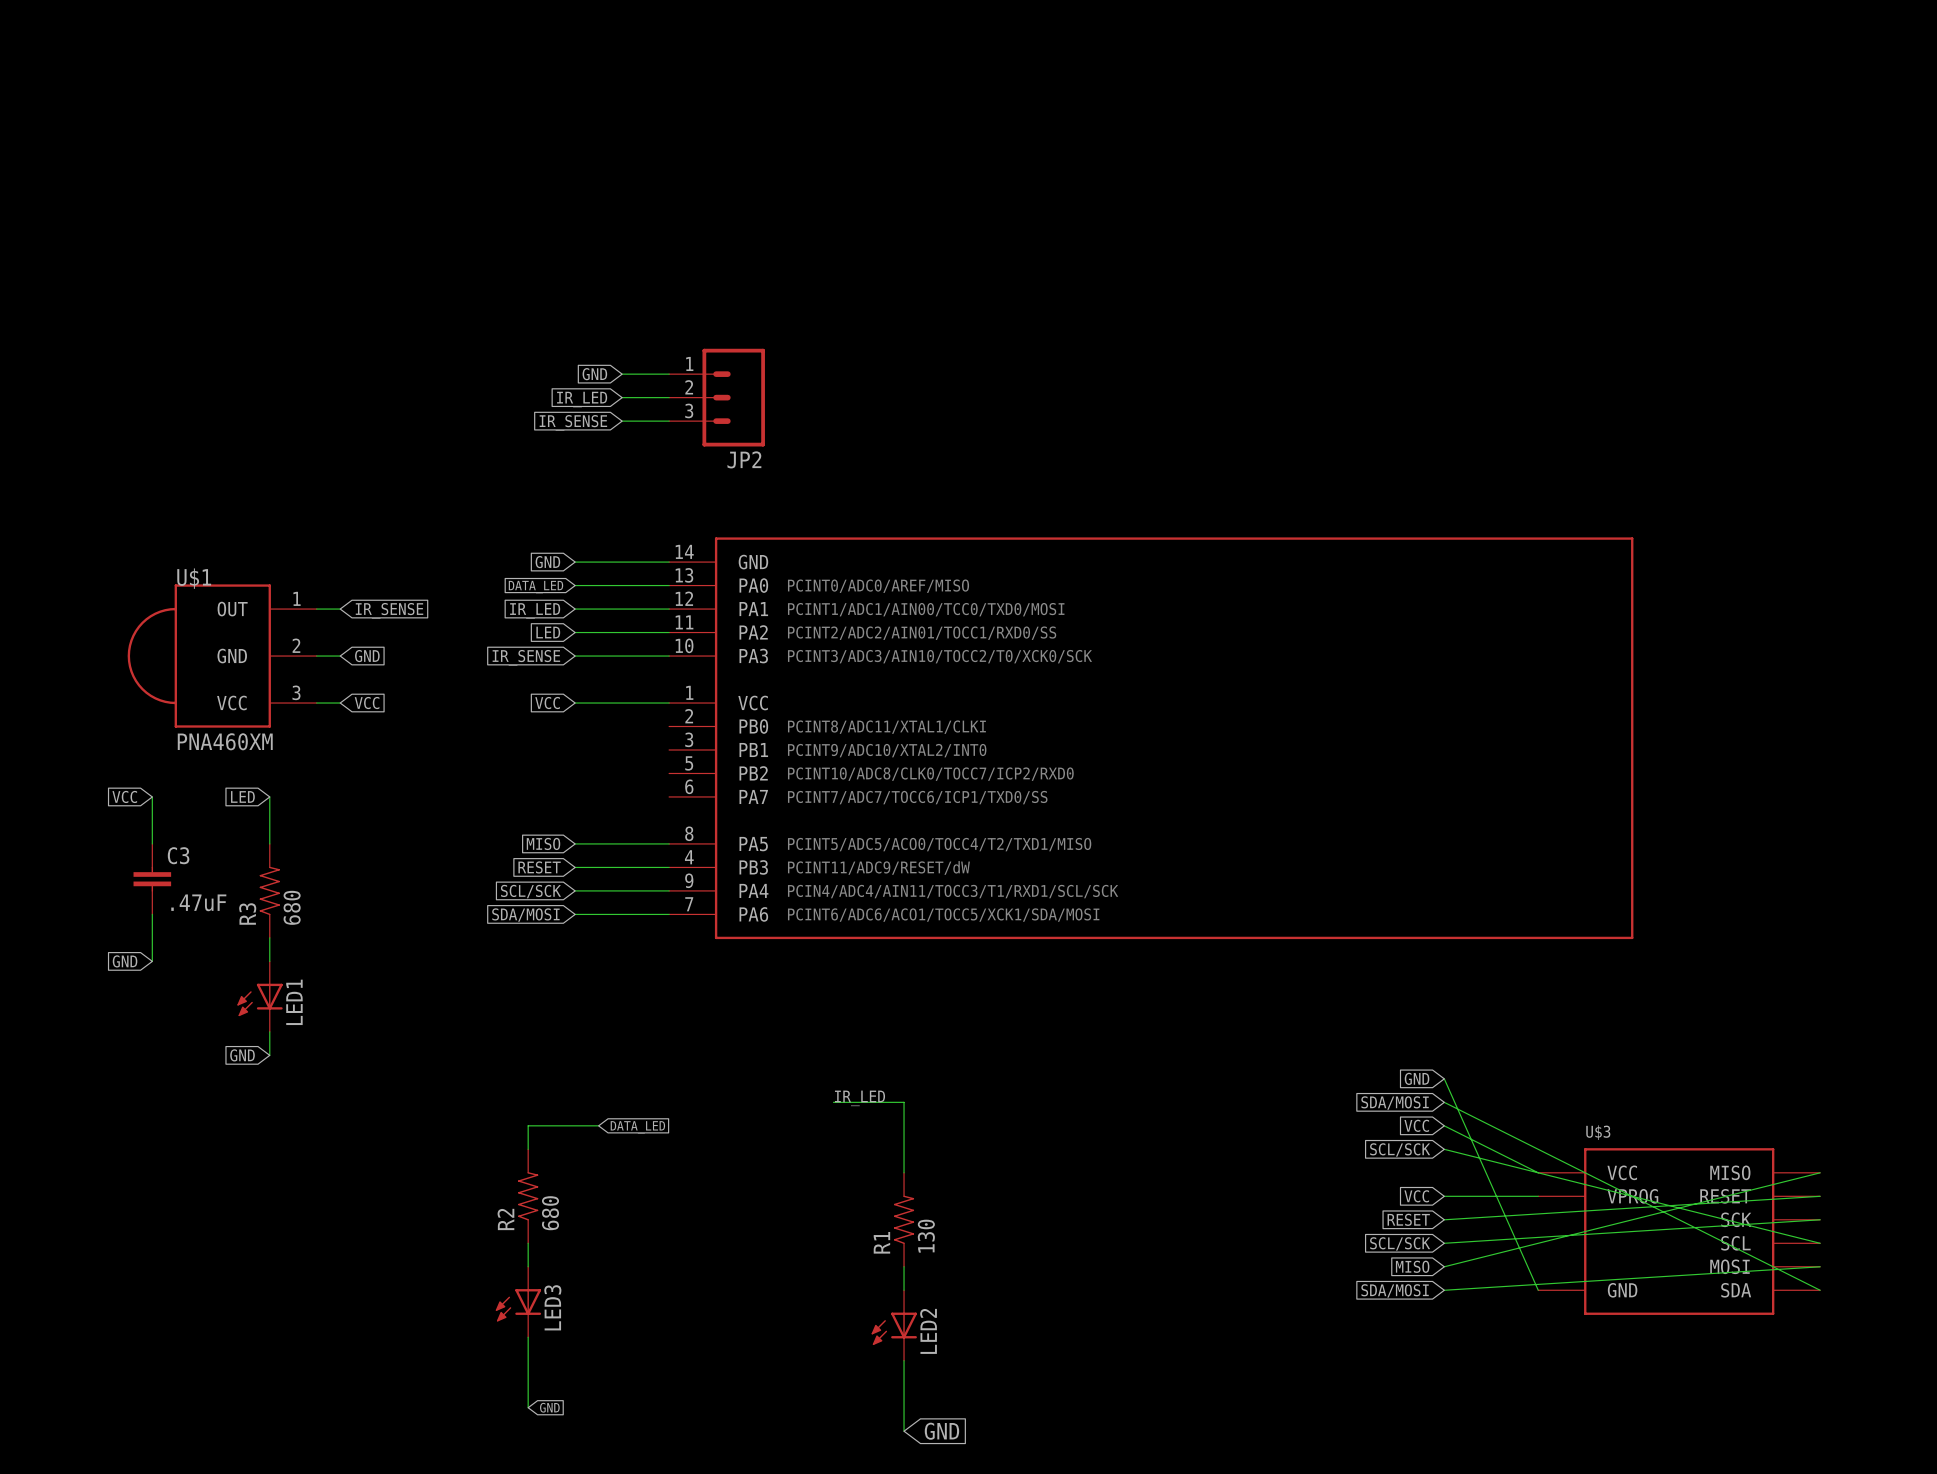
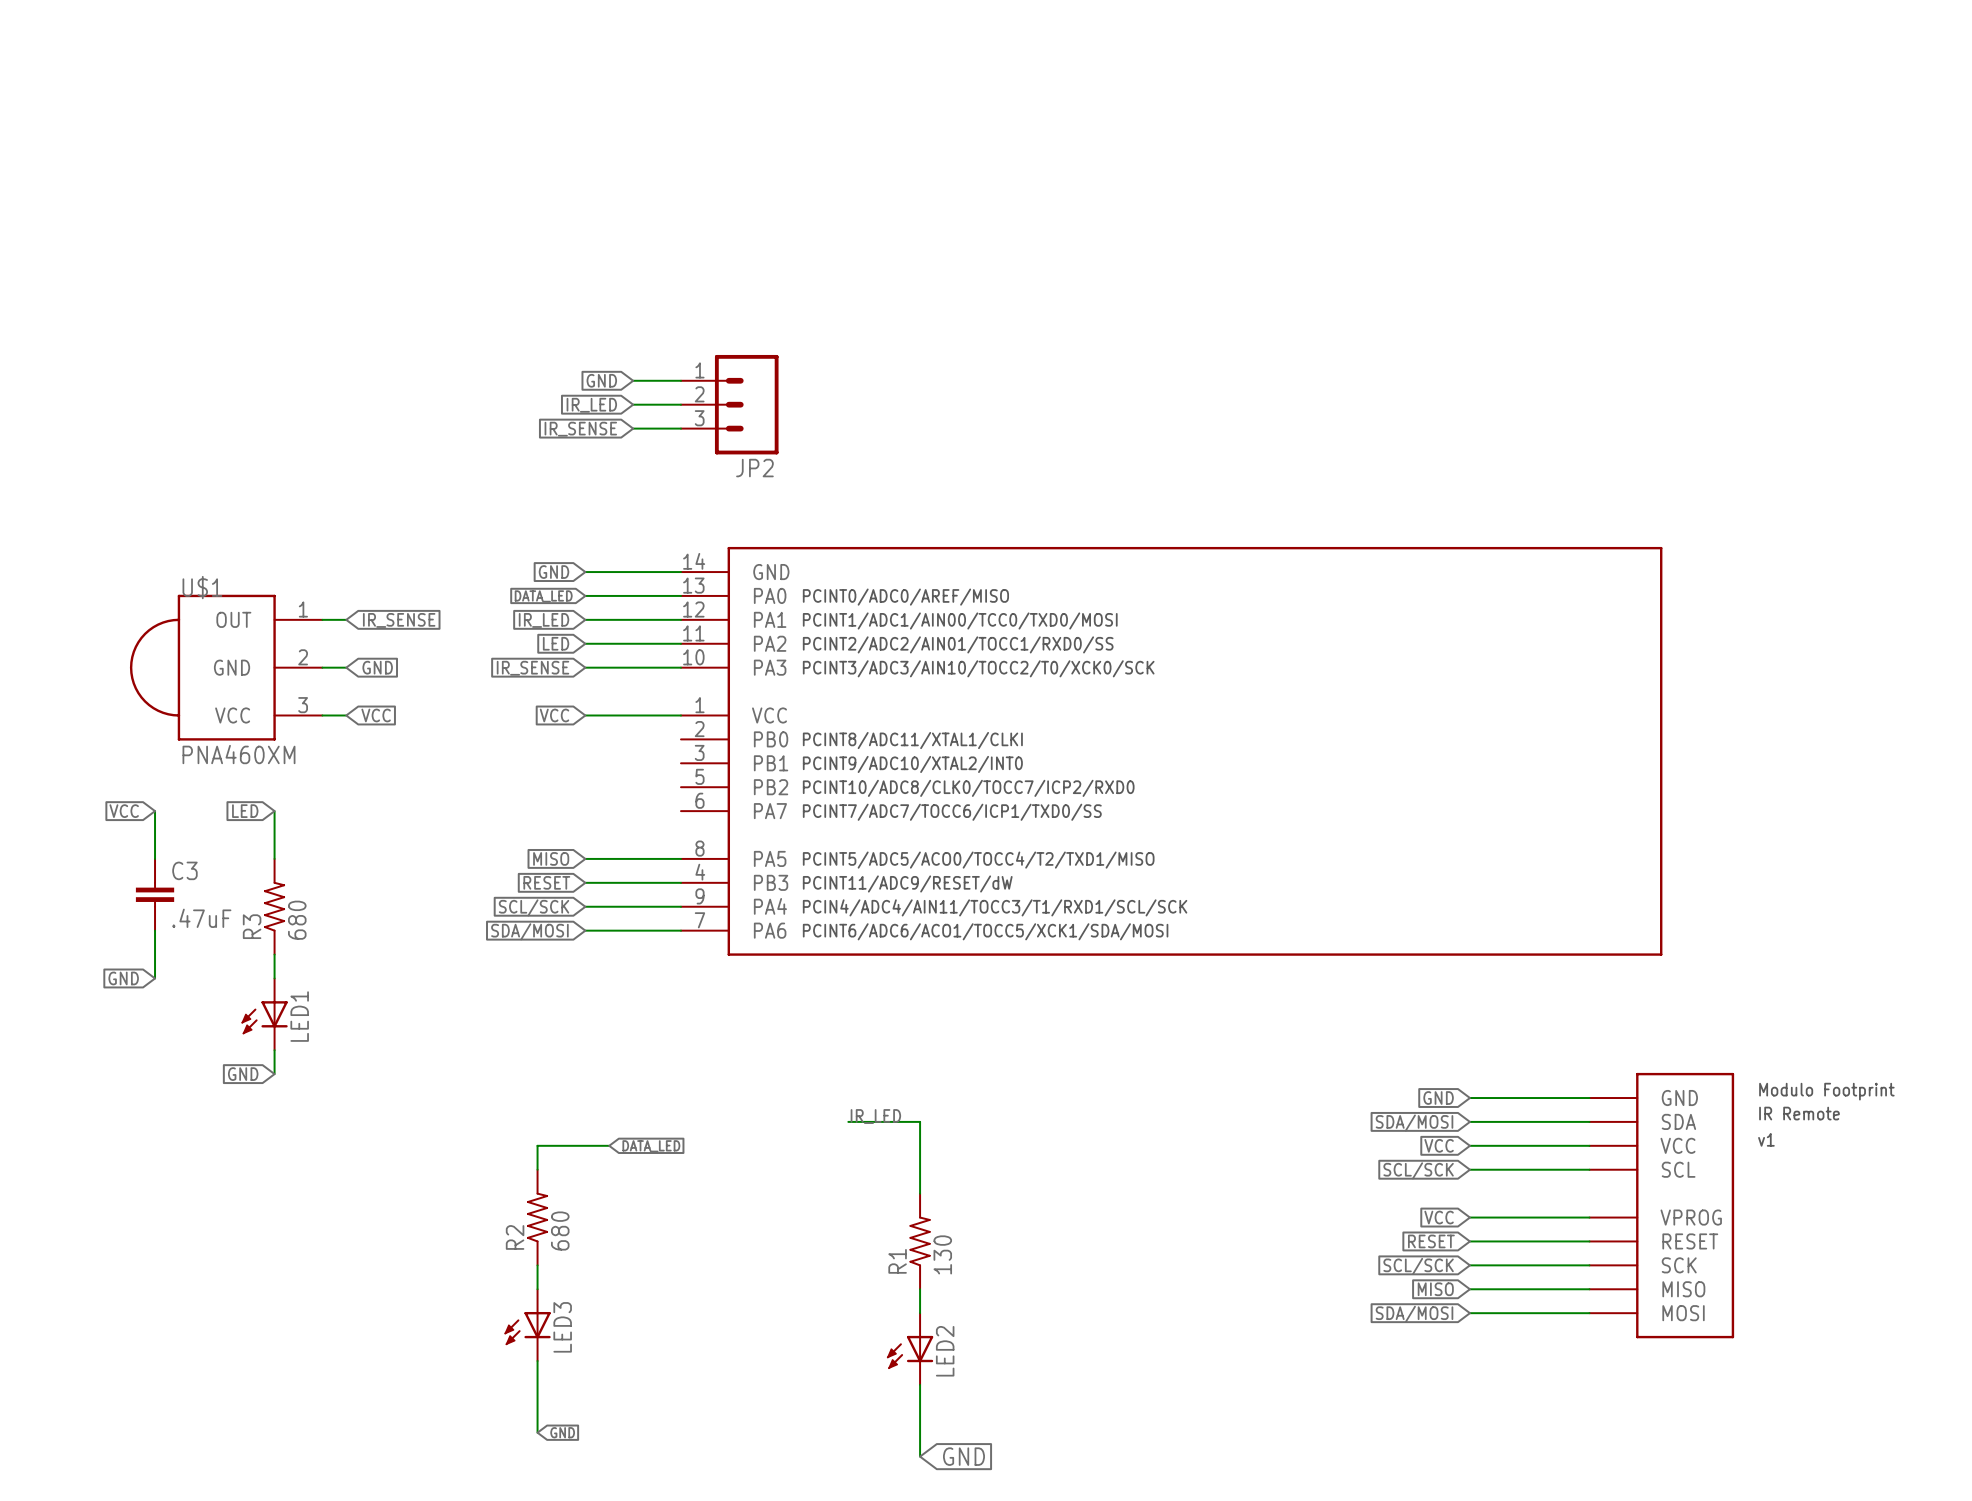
wire: (1444, 1078) (1538, 1290) -> (1469, 1098) (1589, 1098)
wire: (1444, 1102) (1820, 1290) -> (1469, 1121) (1589, 1121)
wire: (1444, 1125) (1538, 1172) -> (1469, 1145) (1589, 1145)
wire: (1444, 1149) (1820, 1243) -> (1469, 1169) (1589, 1169)
wire: (1820, 1172) (1444, 1266) -> (1589, 1289) (1469, 1289)
part: none -> (1661, 1205)
wire: (1820, 1196) (1444, 1219) -> (1589, 1241) (1469, 1241)
wire: (1820, 1219) (1444, 1243) -> (1589, 1265) (1469, 1265)
U$3: (1679, 1231) -> none
wire: (1820, 1266) (1444, 1290) -> (1589, 1313) (1469, 1313)

